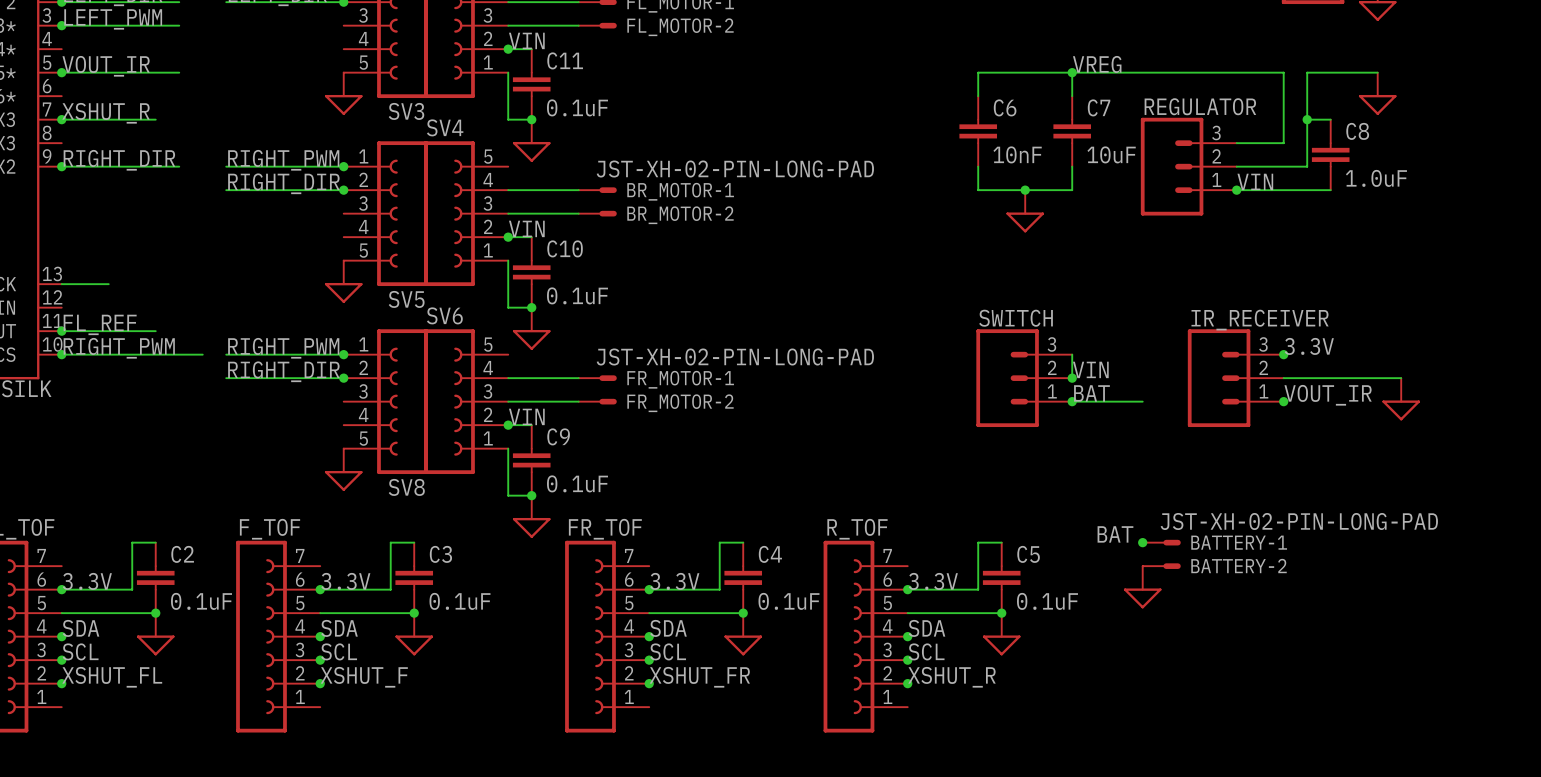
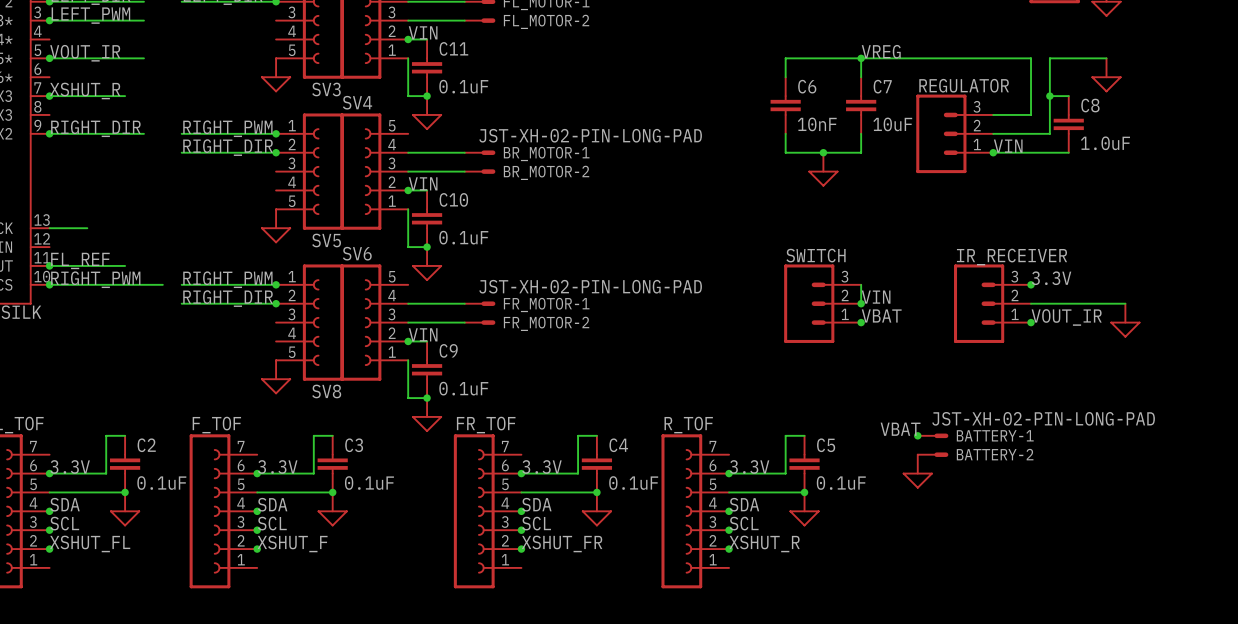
label: BAT (1091, 393) -> VBAT (881, 315)
wire: (1072, 401) (1142, 401) -> none
label: BAT (1115, 534) -> VBAT (900, 429)

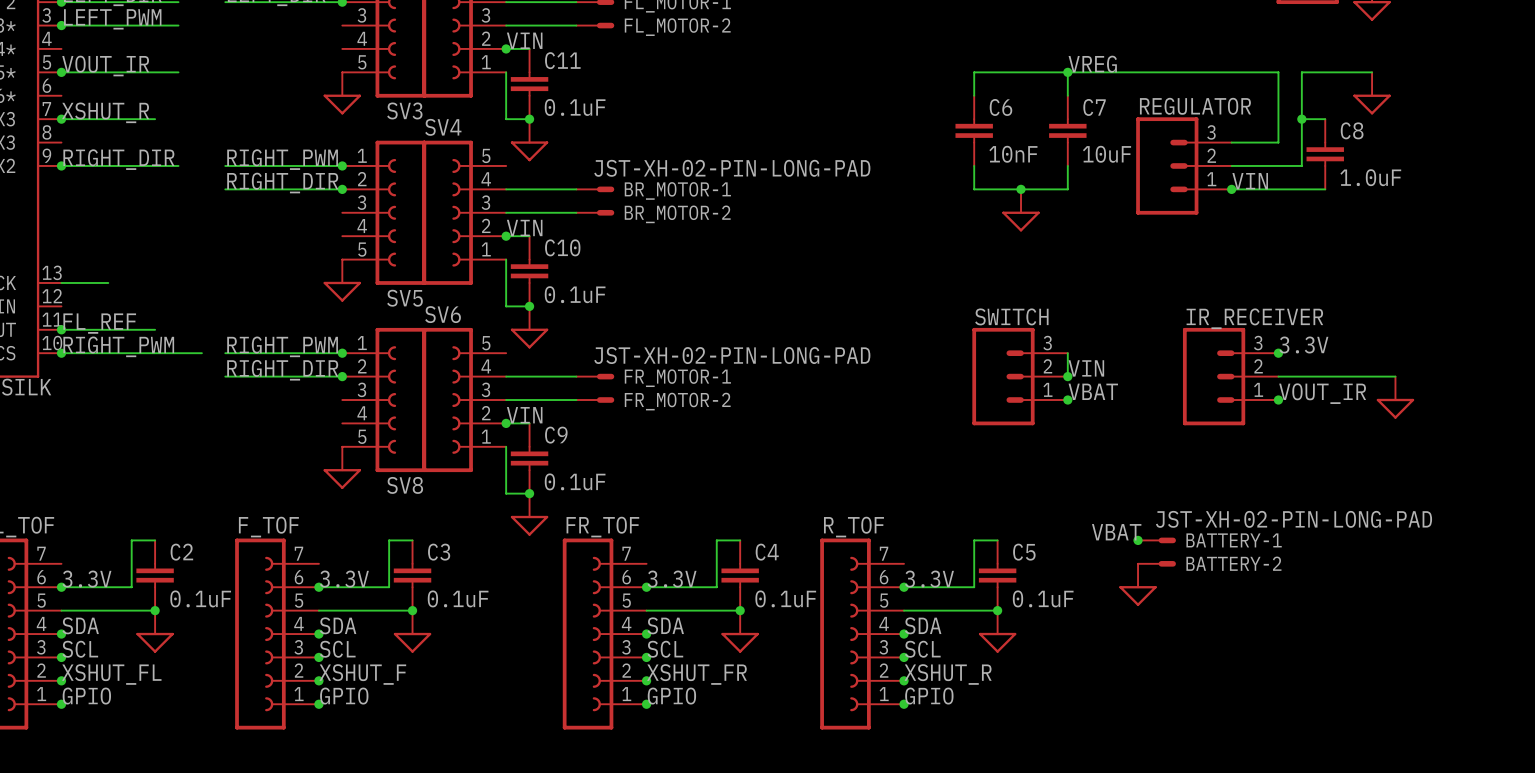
label: none -> GPIO (86, 696)
label: none -> GPIO (344, 696)
label: none -> GPIO (671, 696)
label: none -> GPIO (929, 696)
junction: none -> (61, 704)
junction: none -> (318, 704)
junction: none -> (646, 704)
junction: none -> (903, 704)

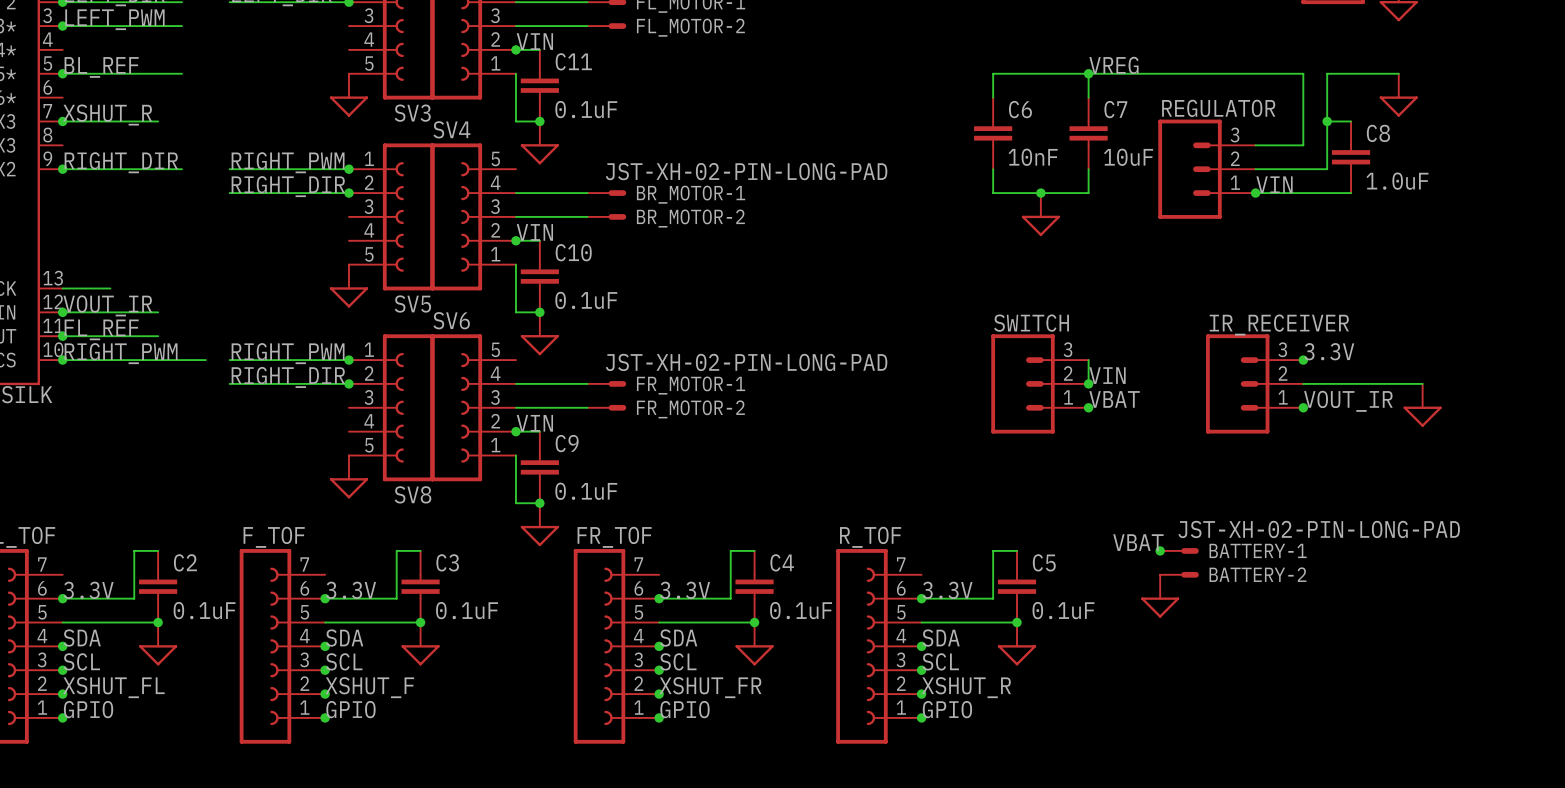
label: VOUT_IR (105, 66) -> BL_REF (101, 67)
label: none -> VOUT_IR (107, 305)
wire: none -> (62, 312) (158, 312)
junction: none -> (62, 312)

